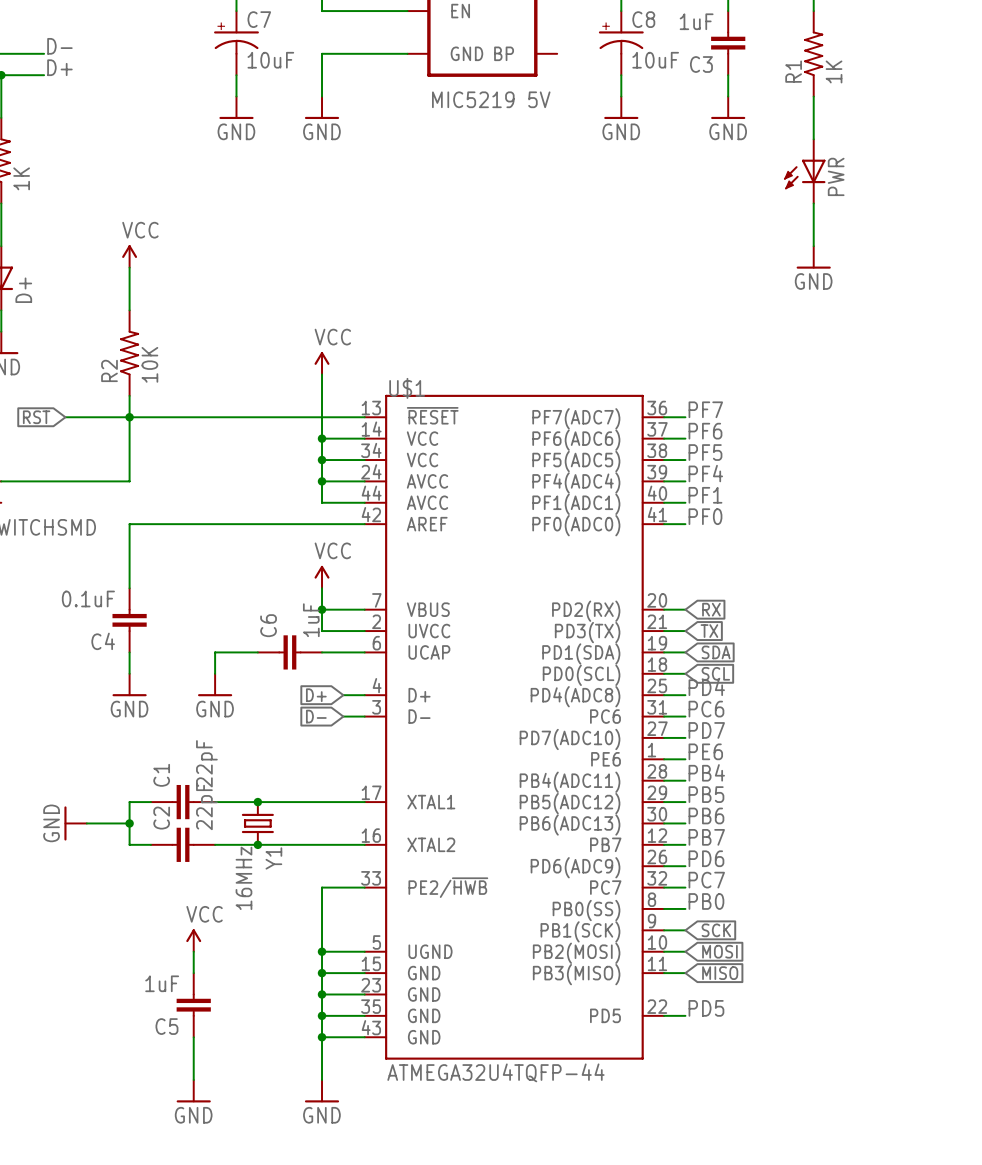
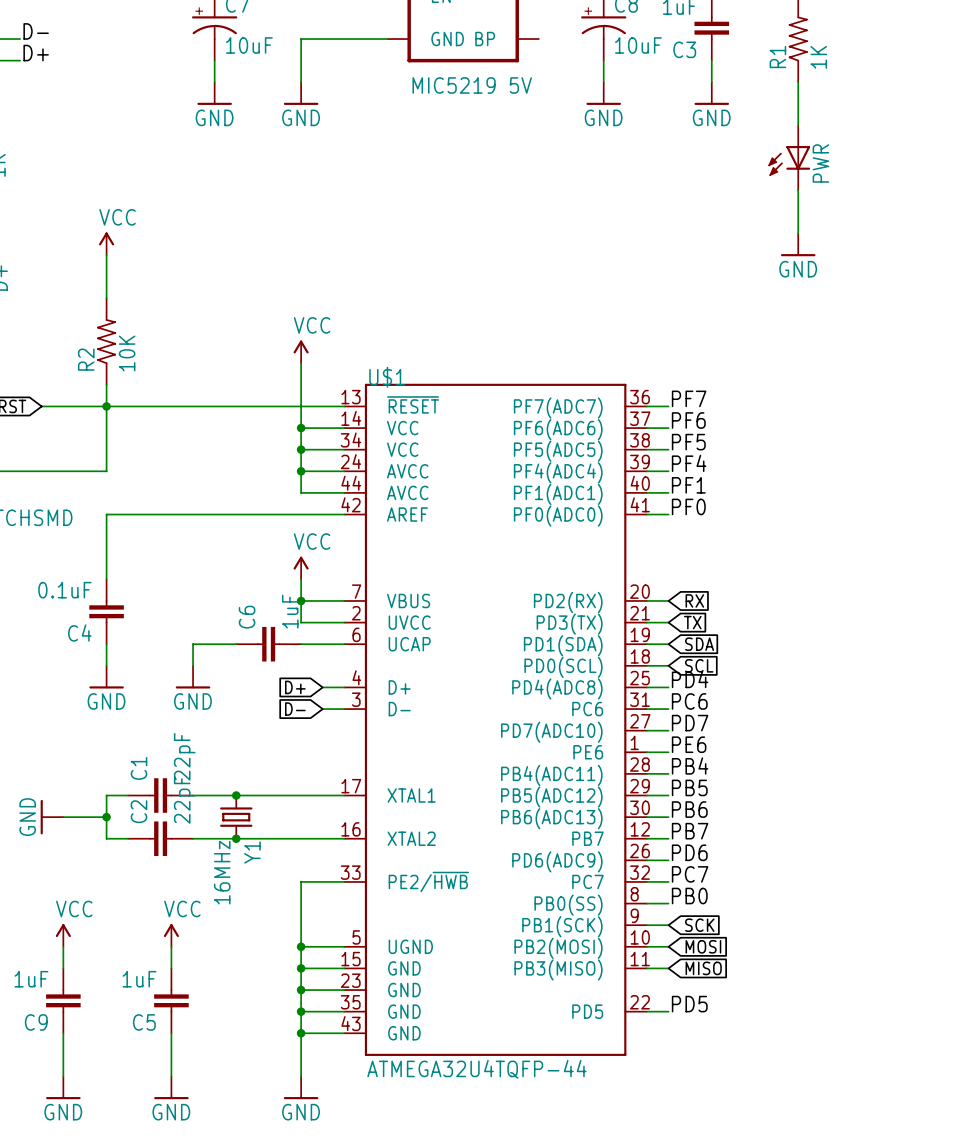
power symbol: none -> VCC (63, 935)
wire: none -> (63, 946) (63, 968)
C9: none -> 1uF (63, 1000)
wire: none -> (63, 1033) (63, 1076)
power symbol: none -> GND (63, 1087)

